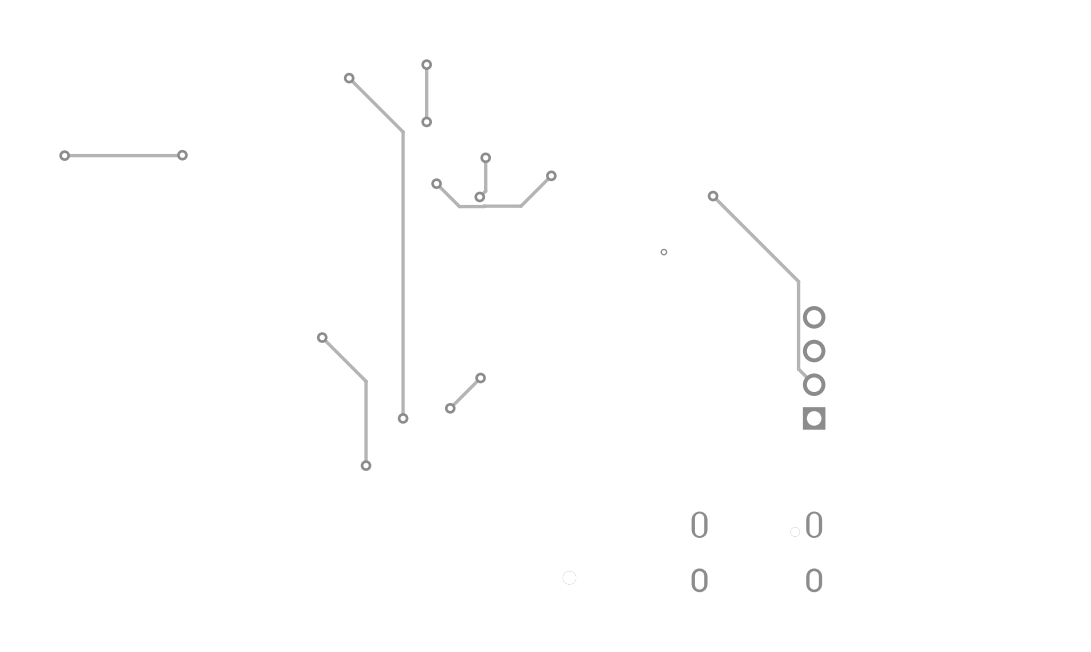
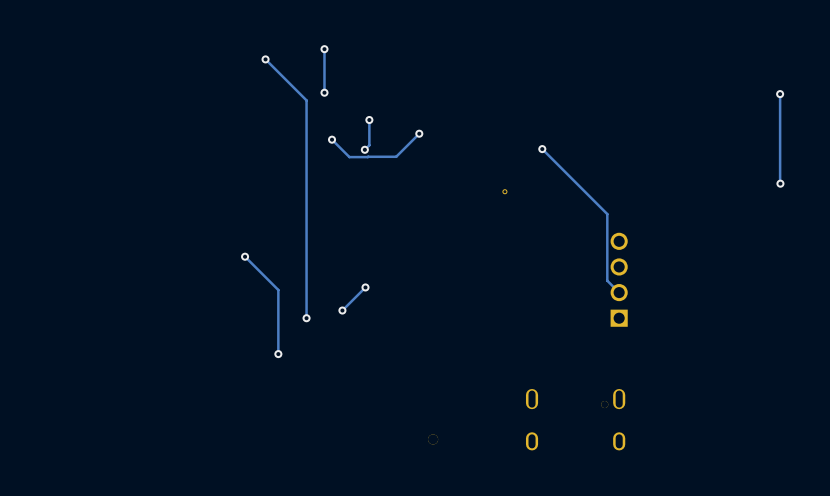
track: none -> (780, 94) (780, 183)
via: none -> (780, 94)
via: (64, 155) -> none
track: (182, 155) (64, 155) -> none
via: (182, 155) -> none
via: none -> (780, 183)

